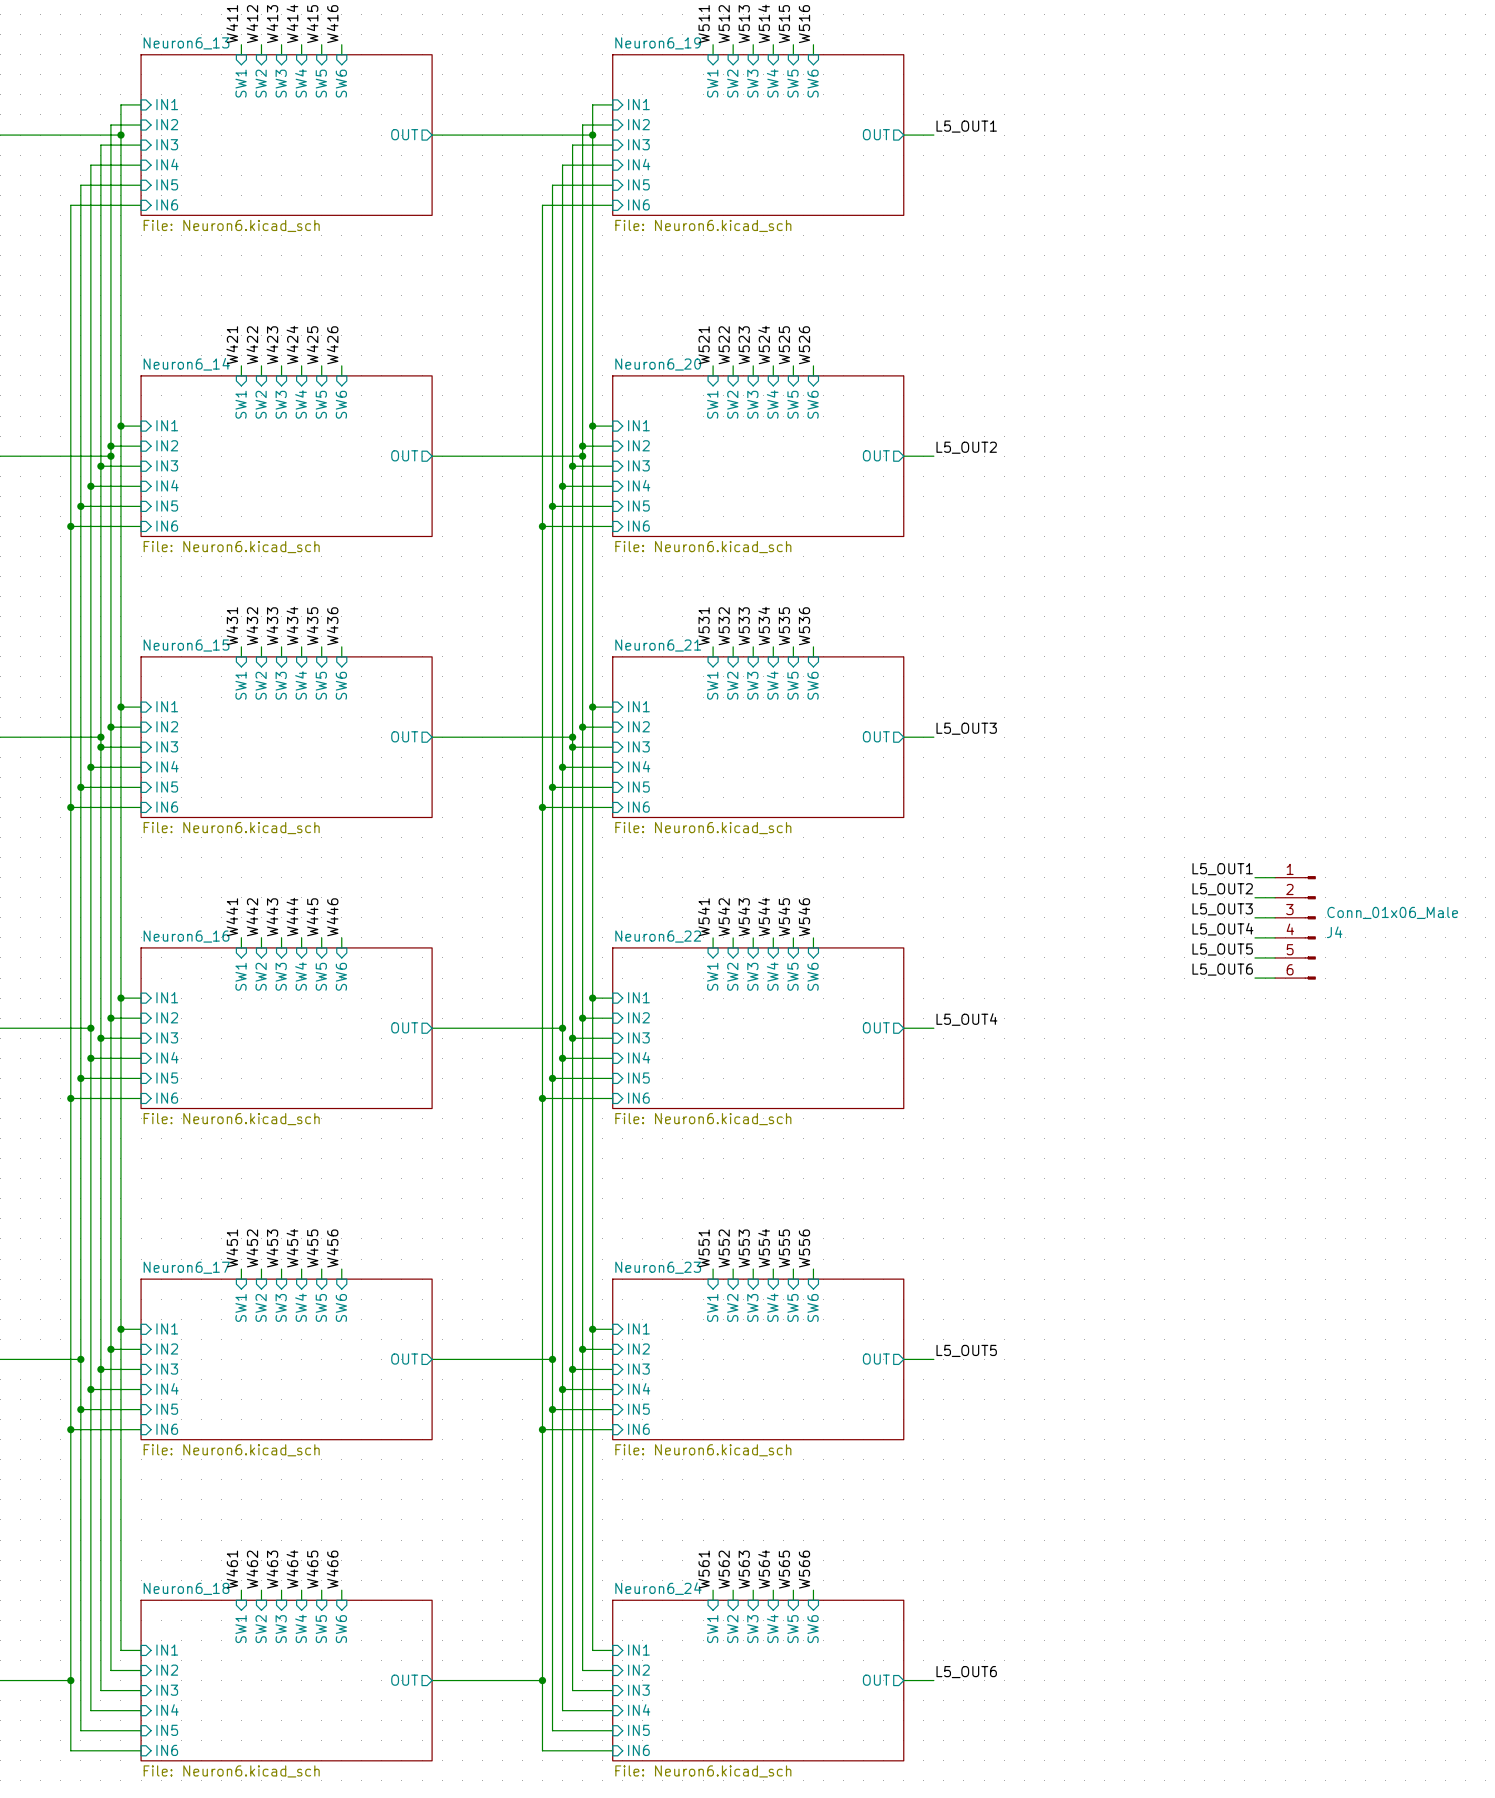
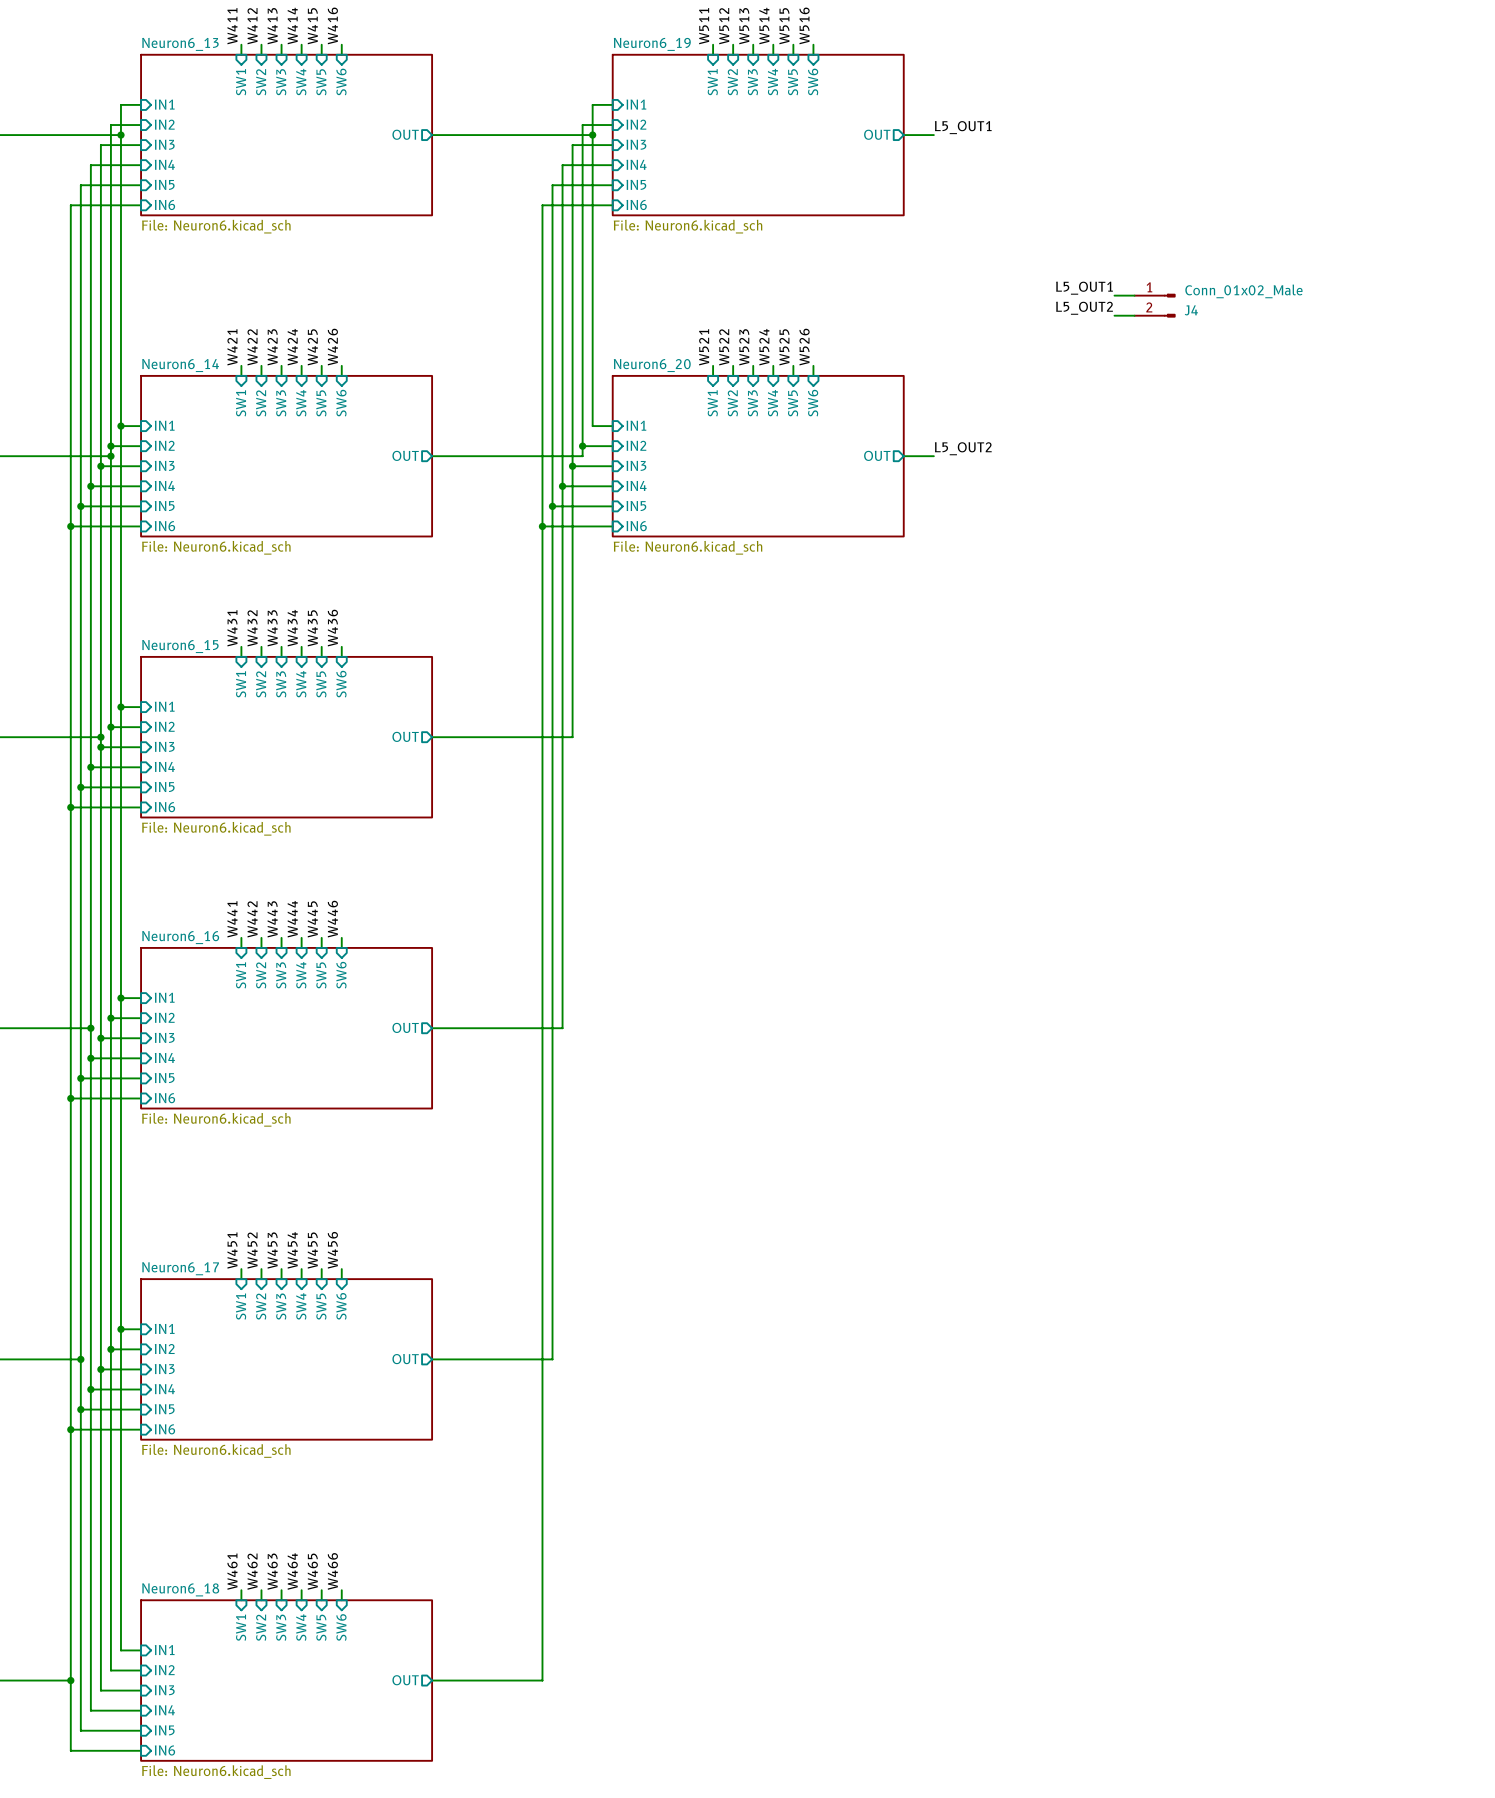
label: none -> L5_OUT1 (1084, 288)
wire: none -> (1114, 295) (1134, 295)
label: none -> L5_OUT2 (1084, 308)
wire: none -> (1114, 315) (1134, 315)
wire: (592, 426) (592, 1650) (612, 1650) -> none
junction: (592, 426) -> none
wire: (582, 456) (582, 1670) (612, 1670) -> none
junction: (582, 456) -> none
label: W531 (704, 626) -> none
label: W532 (724, 626) -> none
label: W533 (744, 626) -> none
label: W534 (764, 626) -> none
label: W535 (784, 626) -> none
label: W536 (804, 626) -> none
wire: (713, 646) (713, 656) -> none
wire: (733, 646) (733, 656) -> none
wire: (753, 646) (753, 656) -> none
wire: (773, 646) (773, 656) -> none
wire: (793, 646) (793, 656) -> none
wire: (813, 646) (813, 656) -> none
sheet pin: SW1 (712, 685) -> none
sheet pin: SW2 (732, 685) -> none
sheet pin: SW3 (752, 685) -> none
sheet pin: SW4 (772, 685) -> none
sheet pin: SW5 (792, 685) -> none
sheet pin: SW6 (813, 685) -> none
sheet pin: IN1 (638, 706) -> none
wire: (592, 707) (612, 707) -> none
junction: (592, 707) -> none
sheet pin: IN2 (638, 726) -> none
wire: (582, 727) (612, 727) -> none
junction: (582, 727) -> none
label: L5_OUT3 (966, 728) -> none
sheet pin: OUT (876, 736) -> none
wire: (572, 737) (572, 1690) (612, 1690) -> none
junction: (572, 737) -> none
sheet Neuron6_21: File: Neuron6.kicad_sch (758, 737) -> none
wire: (903, 737) (933, 737) -> none
sheet pin: IN3 (638, 746) -> none
wire: (572, 747) (612, 747) -> none
junction: (572, 747) -> none
sheet pin: IN4 (639, 766) -> none
wire: (562, 767) (612, 767) -> none
junction: (562, 767) -> none
wire: (552, 787) (612, 787) -> none
junction: (552, 787) -> none
sheet pin: IN5 (638, 787) -> none
wire: (542, 807) (612, 807) -> none
junction: (542, 807) -> none
sheet pin: IN6 (638, 807) -> none
label: L5_OUT1 (1222, 869) -> none
J4 symbol: [1275, 876, 1316, 980] -> [1134, 294, 1176, 318]
wire: (1255, 877) (1275, 877) -> none
label: L5_OUT2 (1222, 889) -> none
wire: (1255, 897) (1275, 897) -> none
label: L5_OUT3 (1222, 909) -> none
J4 value: Conn_01x06_Male (1392, 912) -> Conn_01x02_Male (1243, 291)
label: W541 (703, 917) -> none
label: W542 (723, 917) -> none
label: W543 (744, 917) -> none
label: W544 (764, 917) -> none
label: W545 (784, 917) -> none
label: W546 (804, 917) -> none
wire: (1255, 917) (1275, 917) -> none
label: L5_OUT4 (1222, 929) -> none
wire: (713, 937) (713, 947) -> none
wire: (733, 937) (733, 947) -> none
wire: (753, 937) (753, 947) -> none
wire: (773, 937) (773, 947) -> none
wire: (793, 937) (793, 947) -> none
wire: (813, 937) (813, 947) -> none
wire: (1255, 937) (1275, 937) -> none
label: L5_OUT5 (1222, 949) -> none
wire: (1255, 957) (1275, 957) -> none
label: L5_OUT6 (1222, 969) -> none
sheet pin: SW1 (712, 976) -> none
sheet pin: SW2 (732, 976) -> none
sheet pin: SW3 (752, 976) -> none
sheet pin: SW4 (772, 976) -> none
sheet pin: SW5 (792, 976) -> none
sheet pin: SW6 (813, 976) -> none
wire: (1255, 978) (1275, 978) -> none
sheet pin: IN1 (638, 997) -> none
wire: (592, 998) (612, 998) -> none
junction: (592, 998) -> none
sheet pin: IN2 (638, 1017) -> none
wire: (582, 1018) (612, 1018) -> none
junction: (582, 1018) -> none
label: L5_OUT4 (966, 1019) -> none
sheet pin: OUT (876, 1027) -> none
wire: (562, 1028) (562, 1710) (612, 1710) -> none
junction: (562, 1028) -> none
sheet Neuron6_22: File: Neuron6.kicad_sch (758, 1028) -> none
wire: (903, 1028) (933, 1028) -> none
sheet pin: IN3 (638, 1037) -> none
wire: (572, 1038) (612, 1038) -> none
junction: (572, 1038) -> none
sheet pin: IN4 (639, 1057) -> none
wire: (562, 1058) (612, 1058) -> none
junction: (562, 1058) -> none
wire: (552, 1078) (612, 1078) -> none
junction: (552, 1078) -> none
sheet pin: IN5 (638, 1078) -> none
wire: (542, 1098) (612, 1098) -> none
junction: (542, 1098) -> none
sheet pin: IN6 (638, 1098) -> none
label: W551 (704, 1248) -> none
label: W552 (724, 1248) -> none
label: W553 (744, 1248) -> none
label: W554 (764, 1248) -> none
label: W555 (784, 1248) -> none
label: W556 (804, 1248) -> none
wire: (713, 1269) (713, 1279) -> none
wire: (733, 1269) (733, 1279) -> none
wire: (753, 1269) (753, 1279) -> none
wire: (773, 1269) (773, 1279) -> none
wire: (793, 1269) (793, 1279) -> none
wire: (813, 1269) (813, 1279) -> none
sheet pin: SW1 (712, 1307) -> none
sheet pin: SW2 (732, 1307) -> none
sheet pin: SW3 (752, 1307) -> none
sheet pin: SW4 (772, 1307) -> none
sheet pin: SW5 (792, 1307) -> none
sheet pin: SW6 (813, 1307) -> none
sheet pin: IN1 (638, 1328) -> none
wire: (592, 1329) (612, 1329) -> none
junction: (592, 1329) -> none
sheet pin: IN2 (638, 1348) -> none
wire: (582, 1349) (612, 1349) -> none
junction: (582, 1349) -> none
label: L5_OUT5 (966, 1350) -> none
wire: (552, 1359) (552, 1730) (612, 1730) -> none
junction: (552, 1359) -> none
sheet Neuron6_23: File: Neuron6.kicad_sch (758, 1359) -> none
sheet pin: OUT (876, 1359) -> none
wire: (903, 1359) (933, 1359) -> none
wire: (572, 1369) (612, 1369) -> none
junction: (572, 1369) -> none
sheet pin: IN3 (638, 1369) -> none
sheet pin: IN4 (639, 1388) -> none
wire: (562, 1389) (612, 1389) -> none
junction: (562, 1389) -> none
wire: (552, 1409) (612, 1409) -> none
junction: (552, 1409) -> none
sheet pin: IN5 (638, 1409) -> none
wire: (542, 1429) (612, 1429) -> none
junction: (542, 1429) -> none
sheet pin: IN6 (638, 1429) -> none
label: W561 (704, 1569) -> none
label: W562 (724, 1569) -> none
label: W563 (744, 1569) -> none
label: W564 (764, 1569) -> none
label: W565 (784, 1569) -> none
label: W566 (804, 1569) -> none
wire: (713, 1590) (713, 1600) -> none
wire: (733, 1590) (733, 1600) -> none
wire: (753, 1590) (753, 1600) -> none
wire: (773, 1590) (773, 1600) -> none
wire: (793, 1590) (793, 1600) -> none
wire: (813, 1590) (813, 1600) -> none
sheet pin: SW4 (772, 1628) -> none
sheet pin: SW1 (712, 1629) -> none
sheet pin: SW2 (732, 1629) -> none
sheet pin: SW3 (752, 1629) -> none
sheet pin: SW5 (792, 1629) -> none
sheet pin: SW6 (813, 1629) -> none
sheet pin: IN1 (638, 1650) -> none
sheet pin: IN2 (638, 1670) -> none
label: L5_OUT6 (966, 1672) -> none
wire: (542, 1680) (542, 1750) (612, 1750) -> none
junction: (542, 1680) -> none
sheet Neuron6_24: File: Neuron6.kicad_sch (758, 1680) -> none
sheet pin: OUT (876, 1680) -> none
wire: (903, 1680) (933, 1680) -> none
sheet pin: IN3 (638, 1690) -> none
sheet pin: IN4 (639, 1710) -> none
sheet pin: IN5 (638, 1730) -> none
sheet pin: IN6 (638, 1750) -> none

